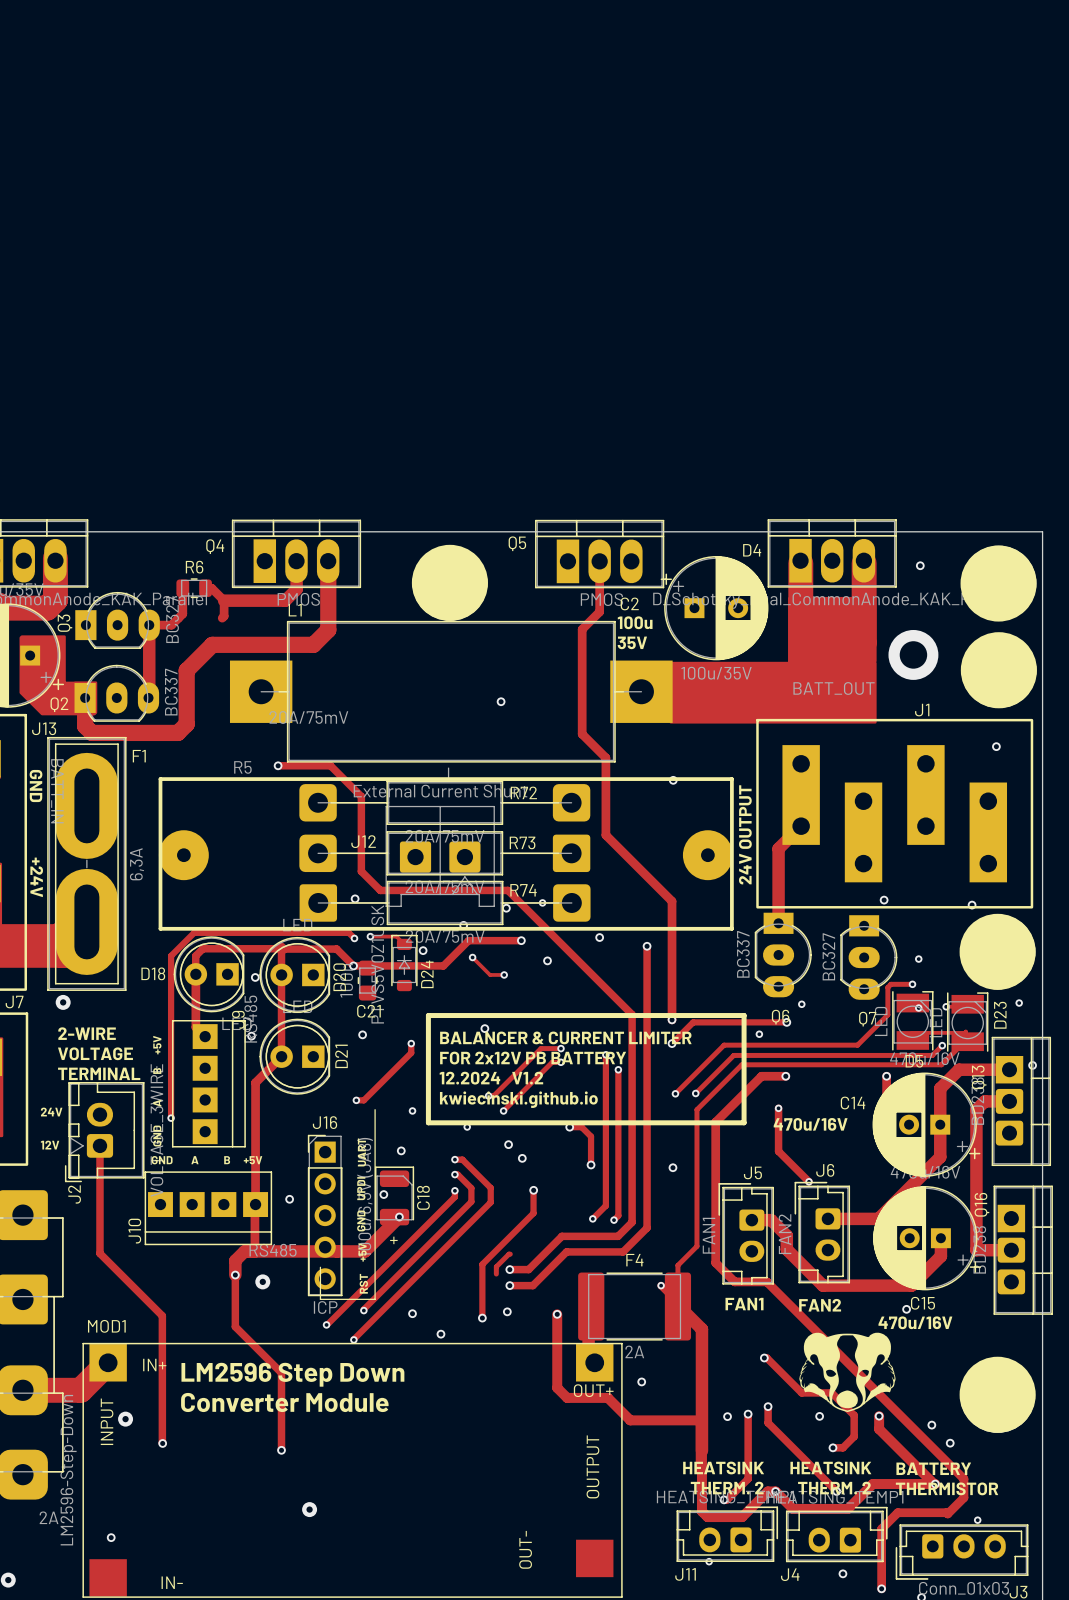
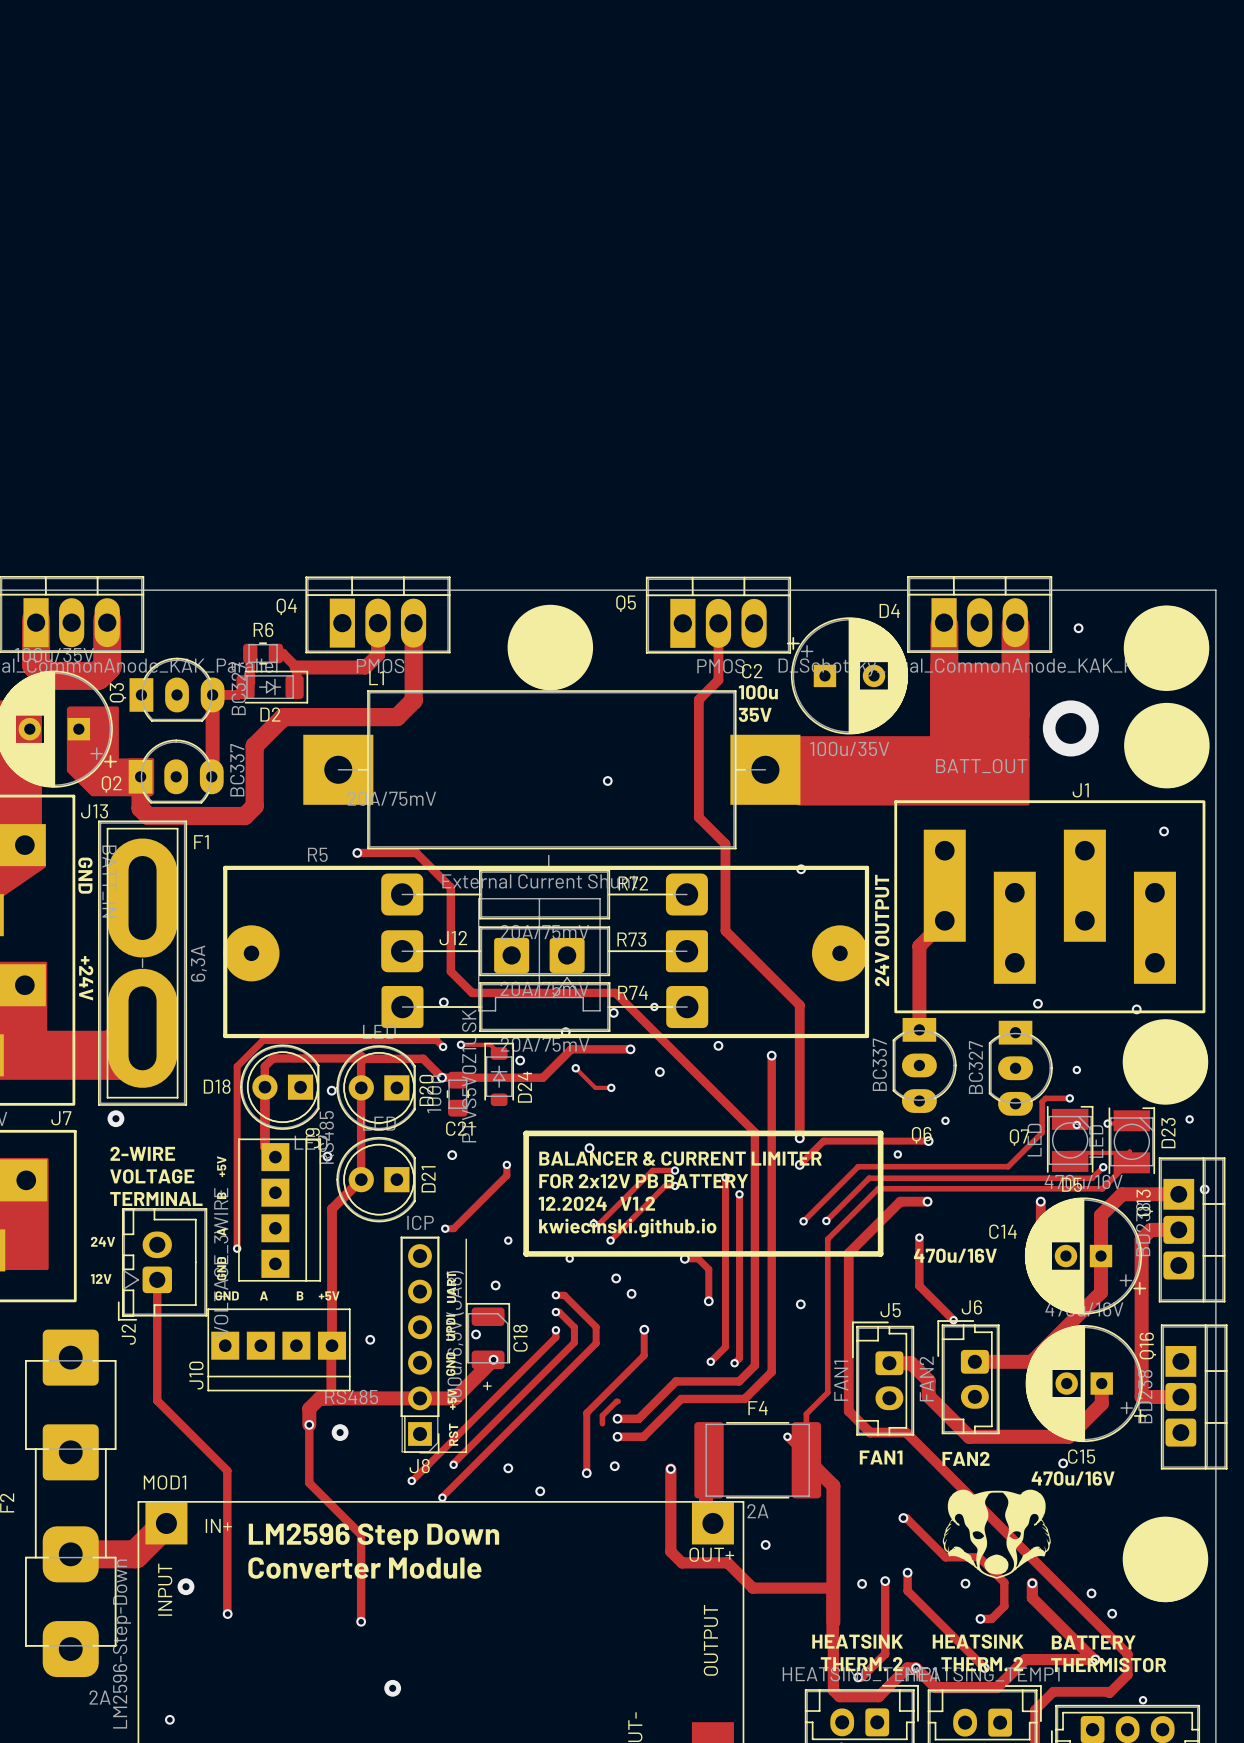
D2: none -> (272, 687)
J8: none -> ICP (420, 1345)
J16: ICP (325, 1215) -> none

